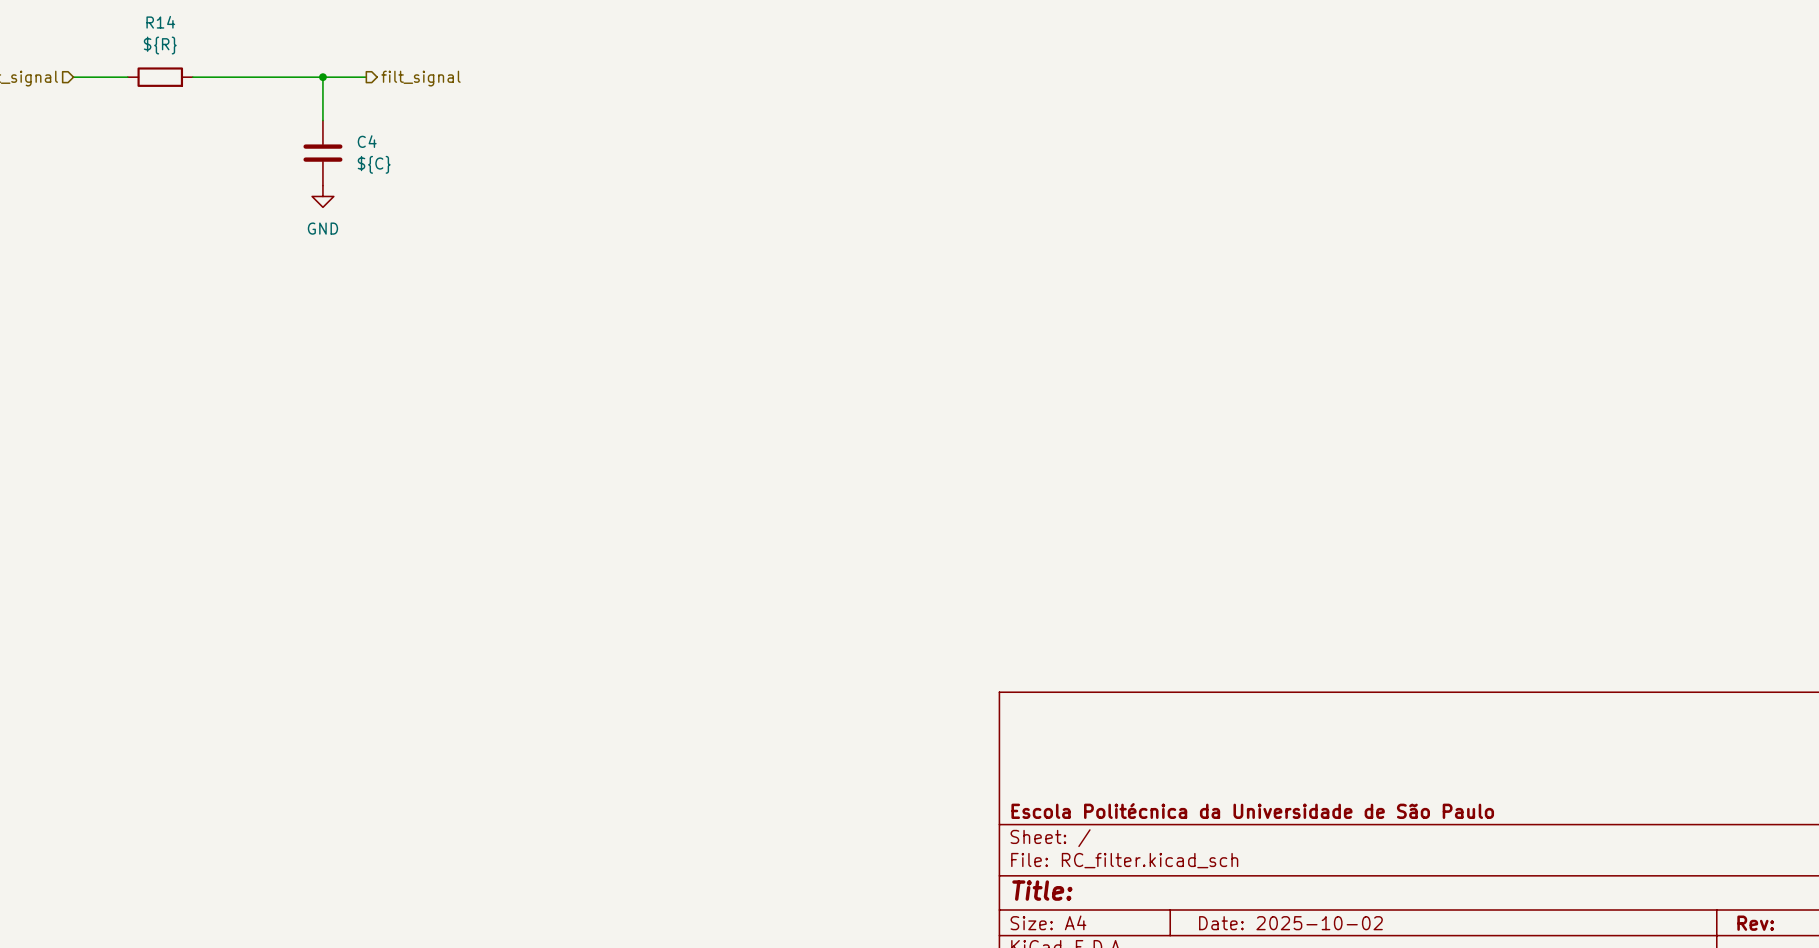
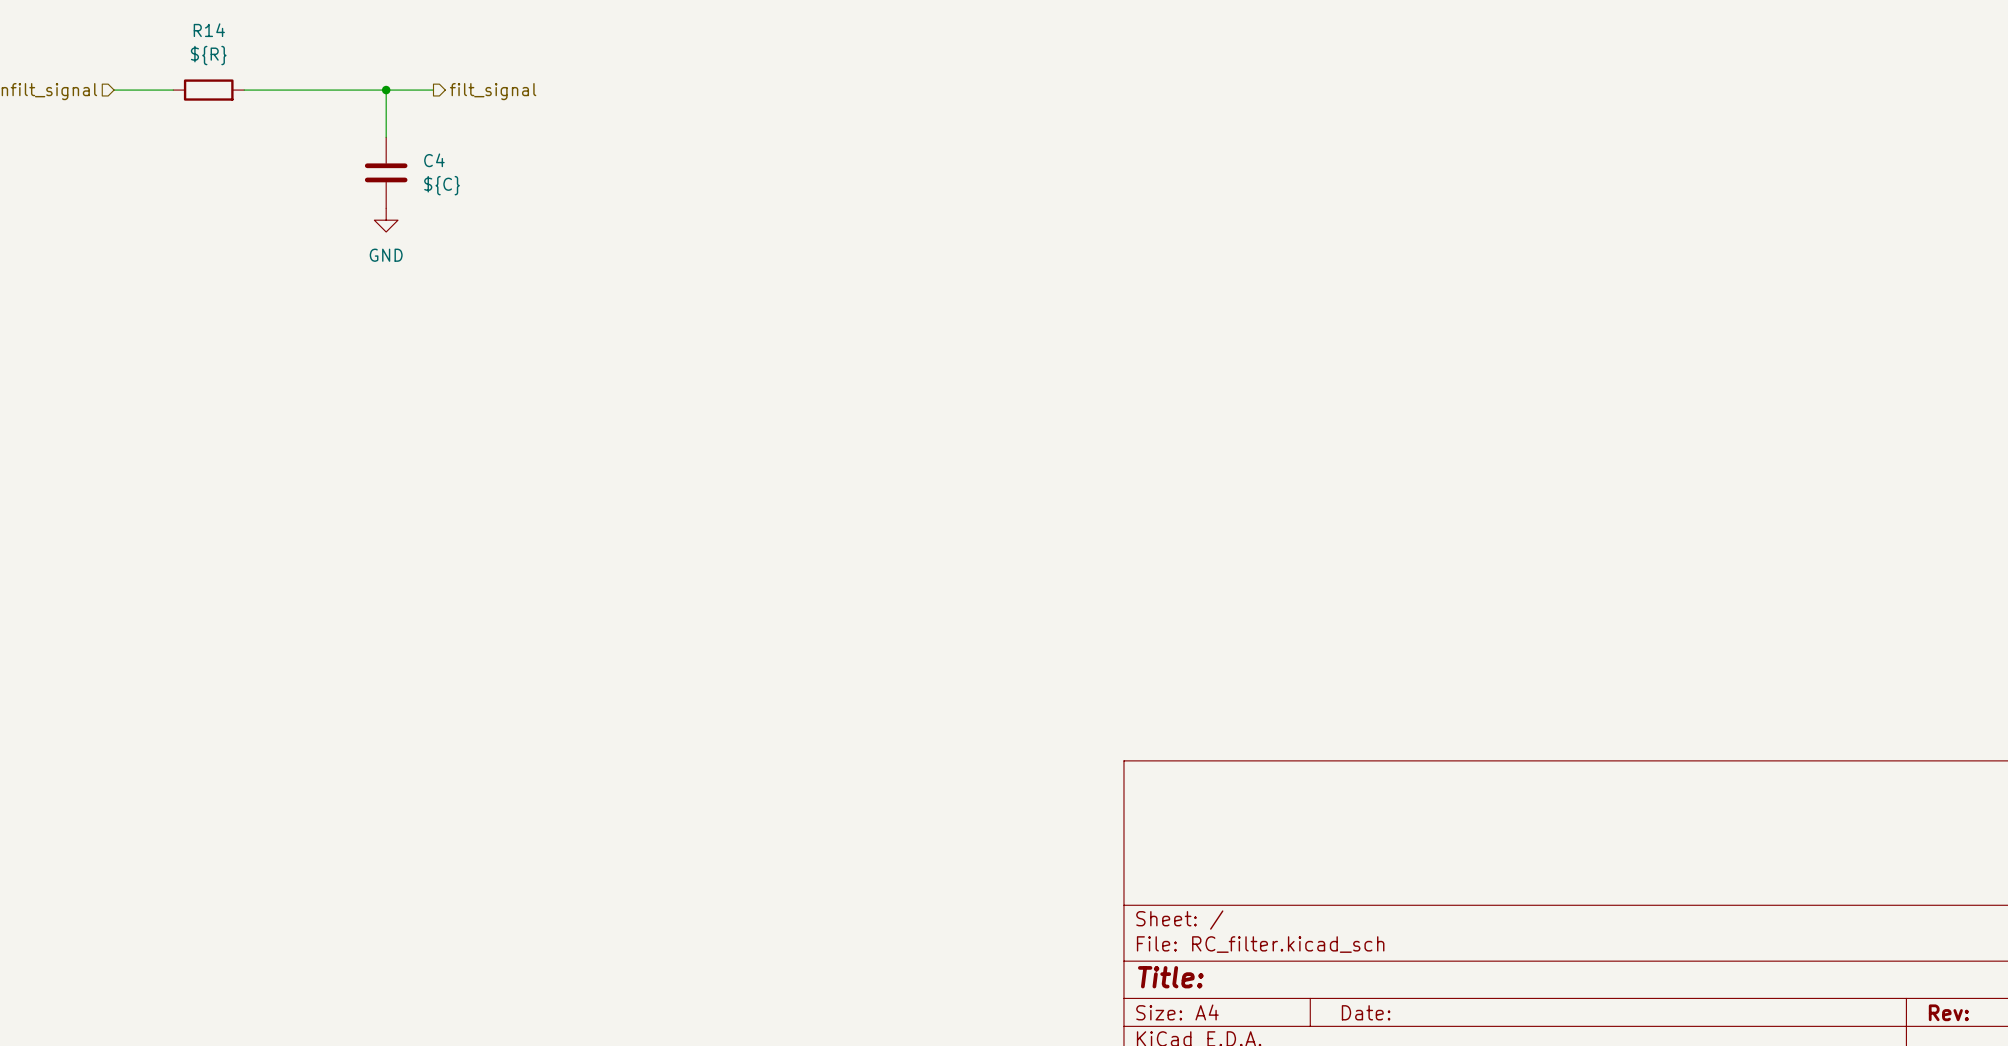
title block: Escola Politécnica da Universidade de São Paulo (1252, 811) -> none
title block: Date: 2025-10-02 (1290, 923) -> Date: (1366, 1012)

